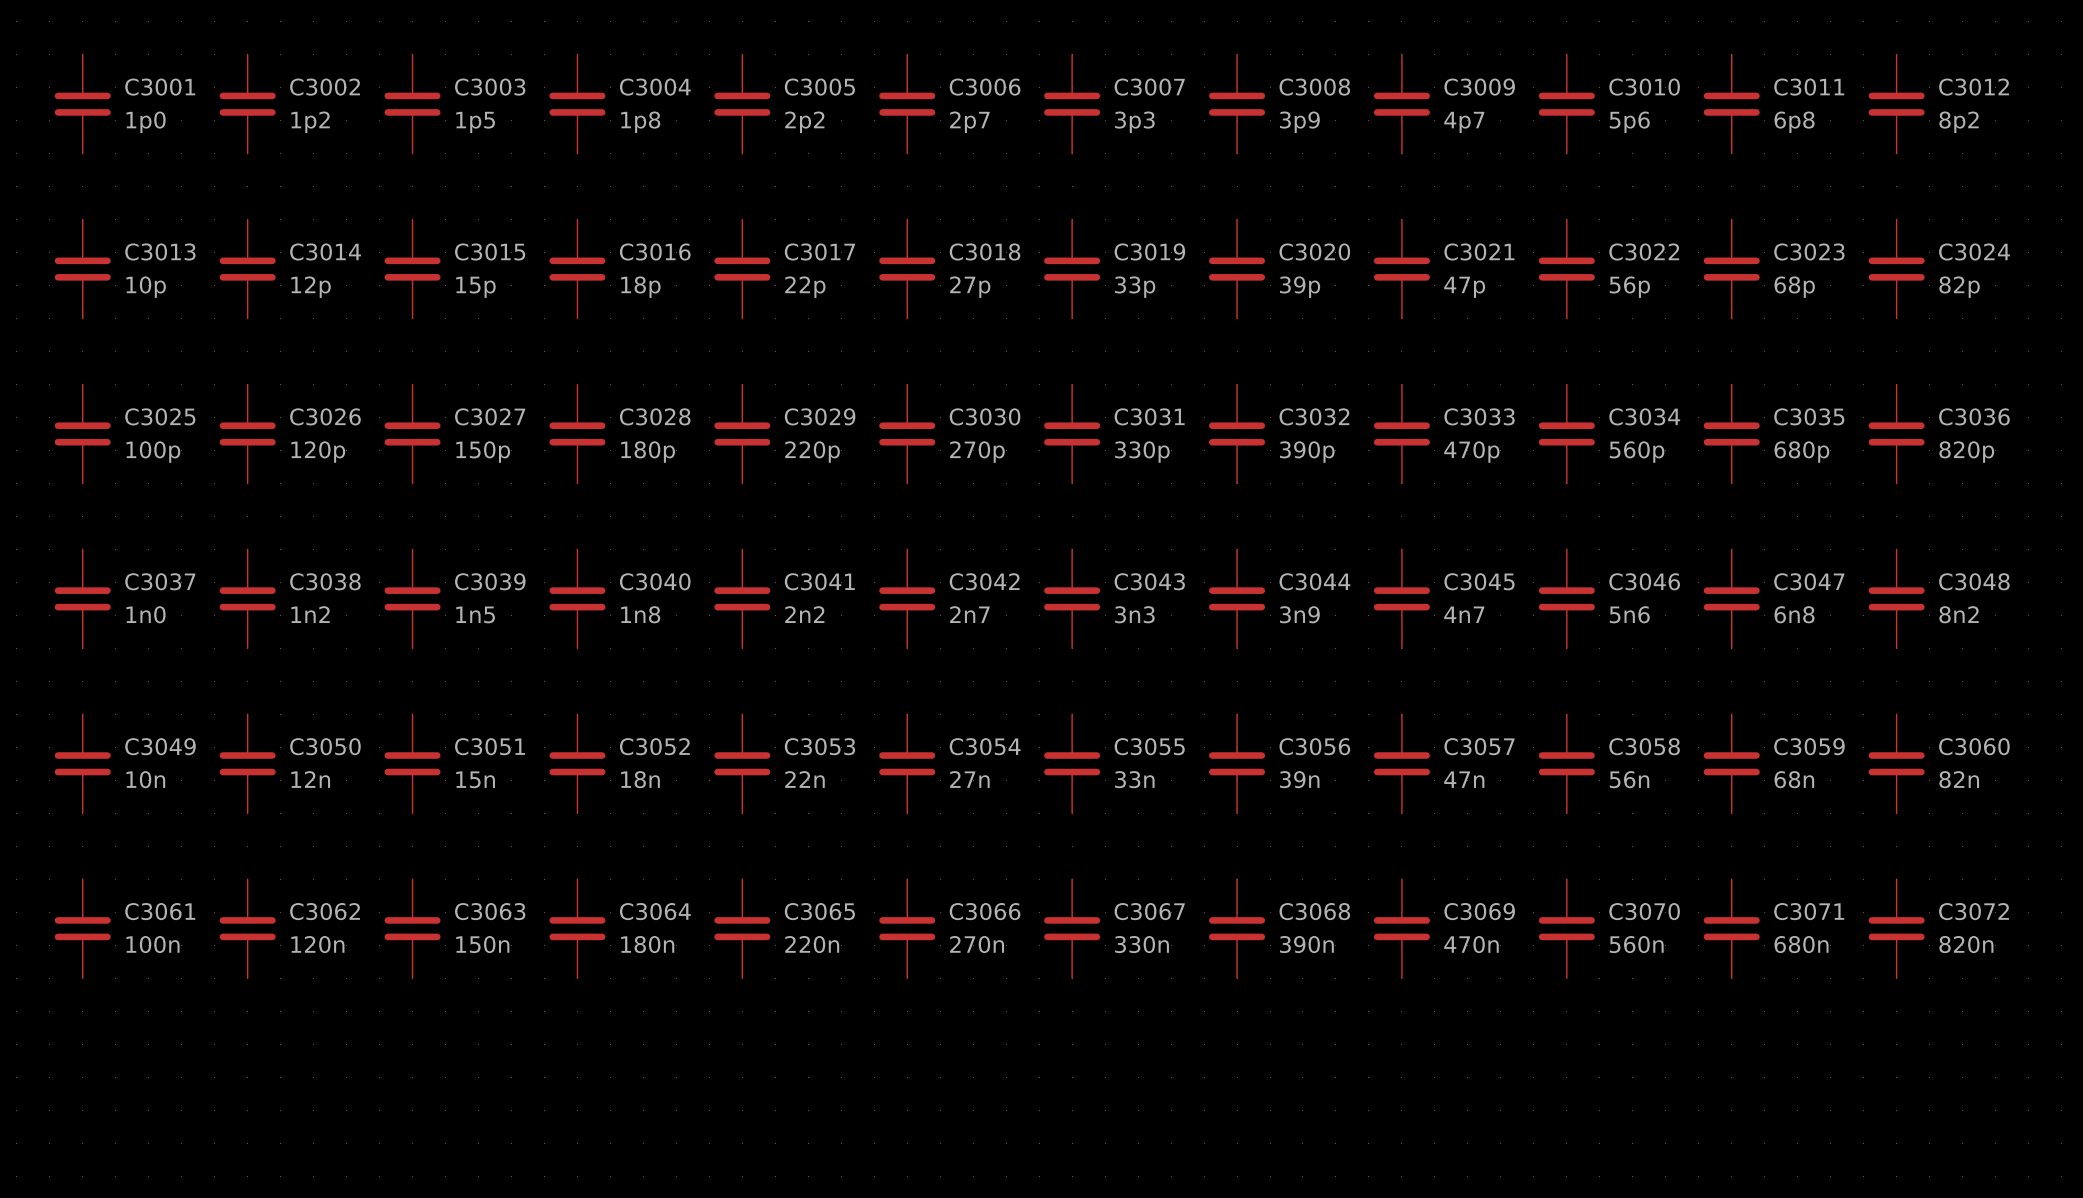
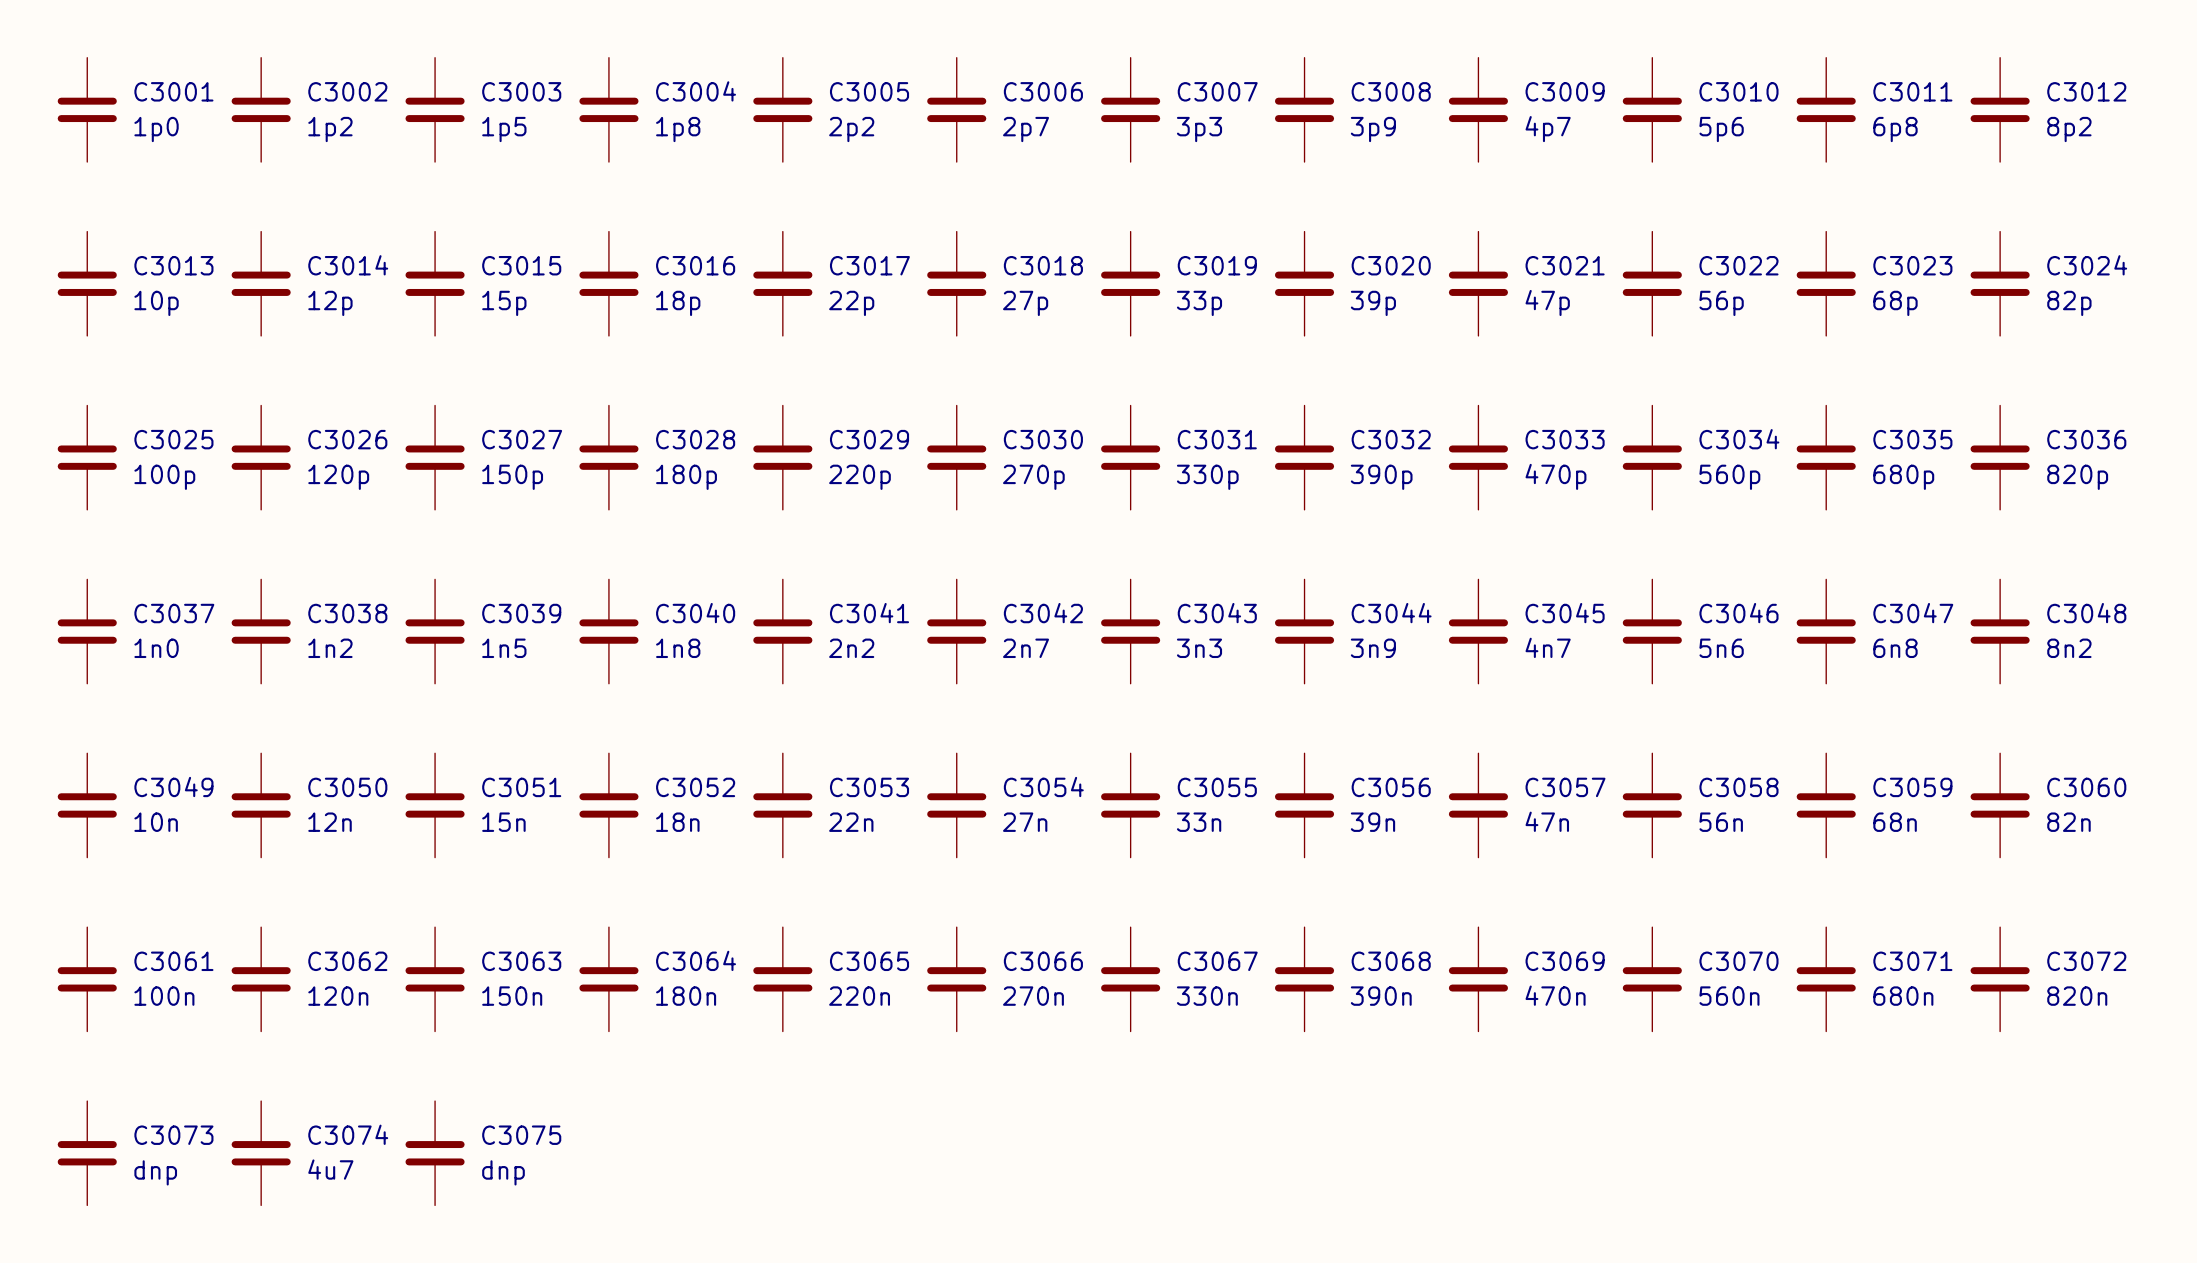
C3073: none -> dnp (87, 1153)
C3074: none -> 4u7 (261, 1153)
C3075: none -> dnp (435, 1153)

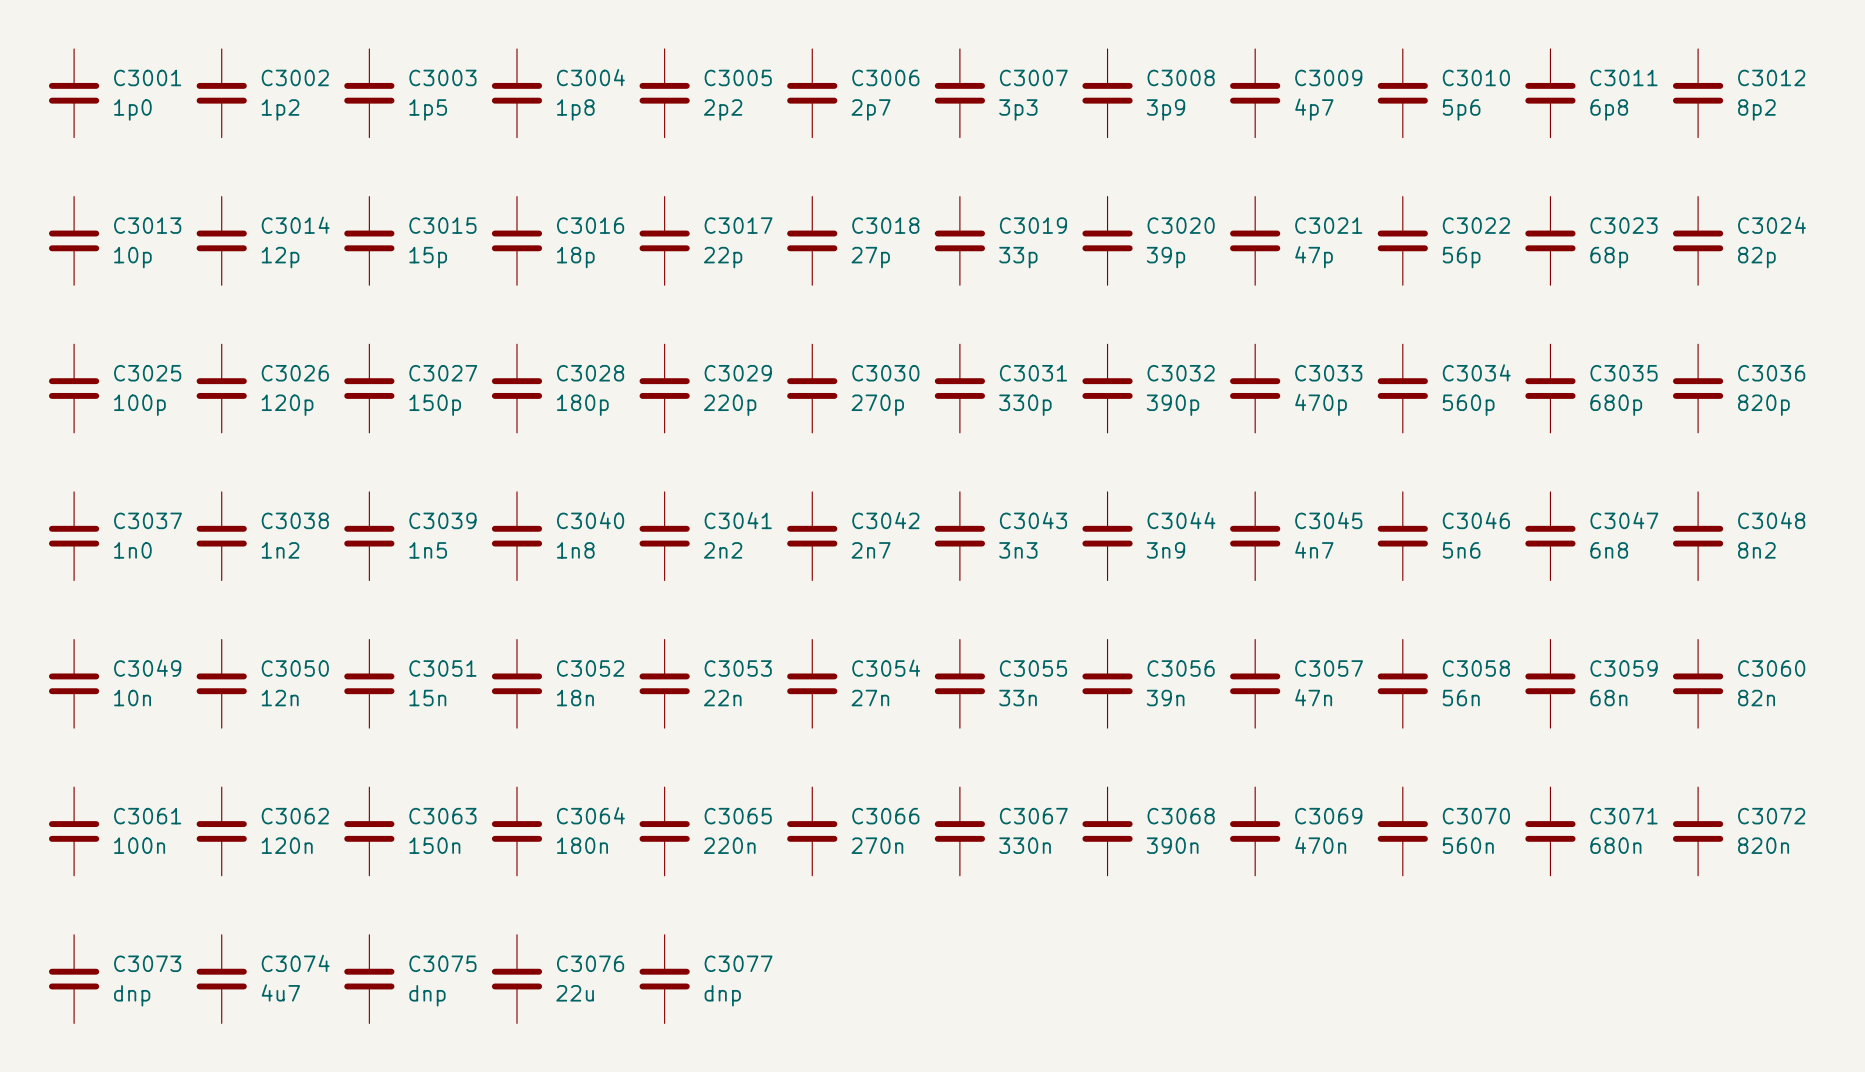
C3076: none -> 22u (516, 979)
C3077: none -> dnp (664, 979)

